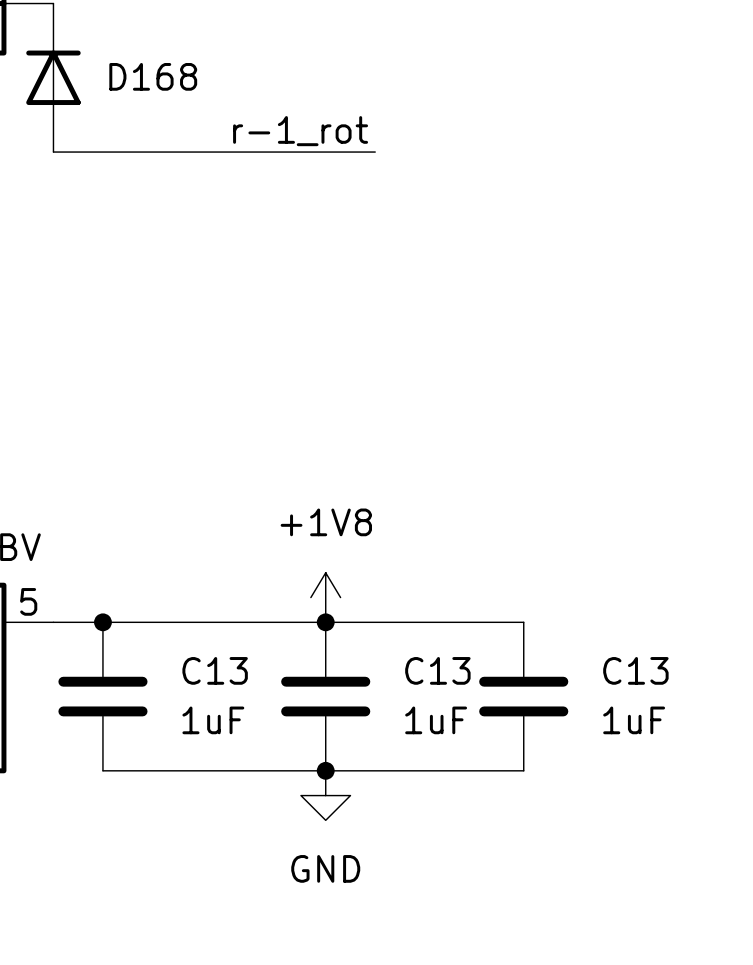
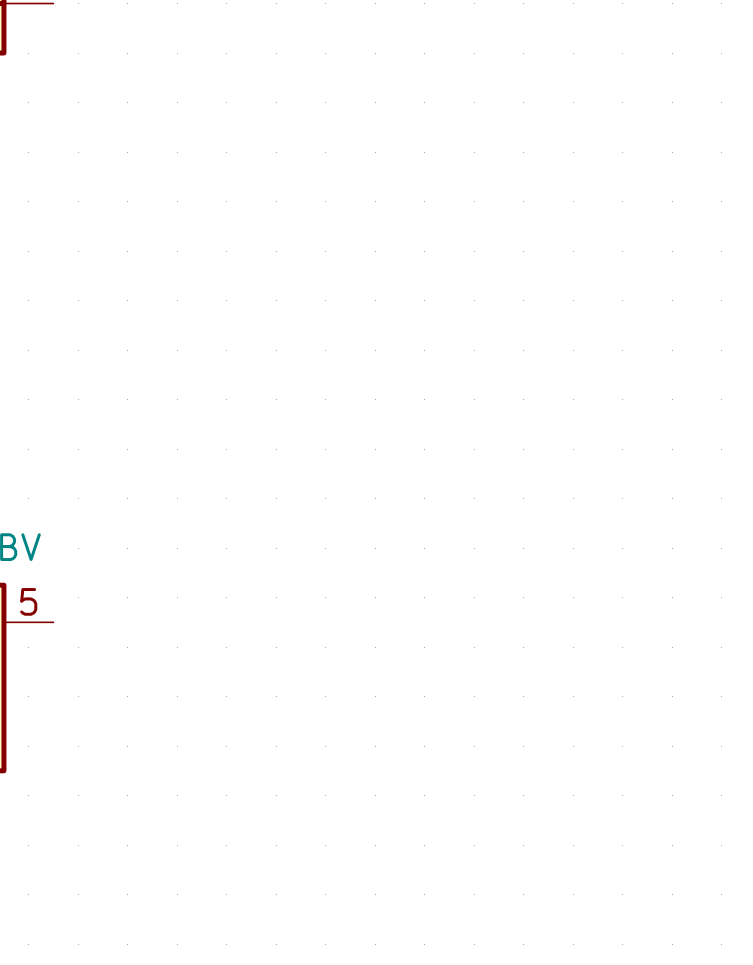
D168: (53, 77) -> none
label: r-1_rot (300, 131) -> none
wire: (53, 152) (375, 152) -> none
power symbol: +1V8 (325, 597) -> none
wire: (53, 622) (523, 622) -> none
junction: (102, 622) -> none
junction: (325, 622) -> none
C13: 1uF (102, 696) -> none
C13: 1uF (325, 696) -> none
C13: 1uF (523, 696) -> none
wire: (102, 770) (523, 770) -> none
junction: (325, 770) -> none
power symbol: GND (325, 795) -> none

